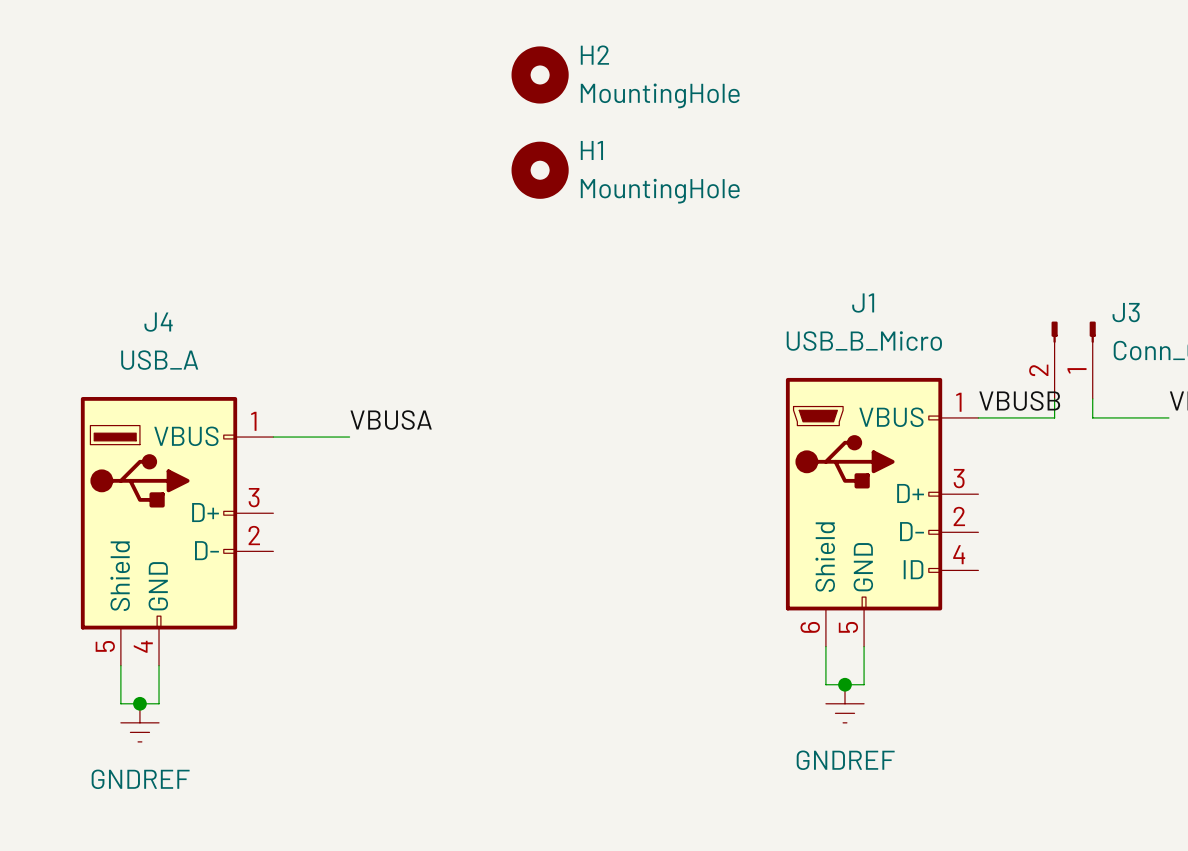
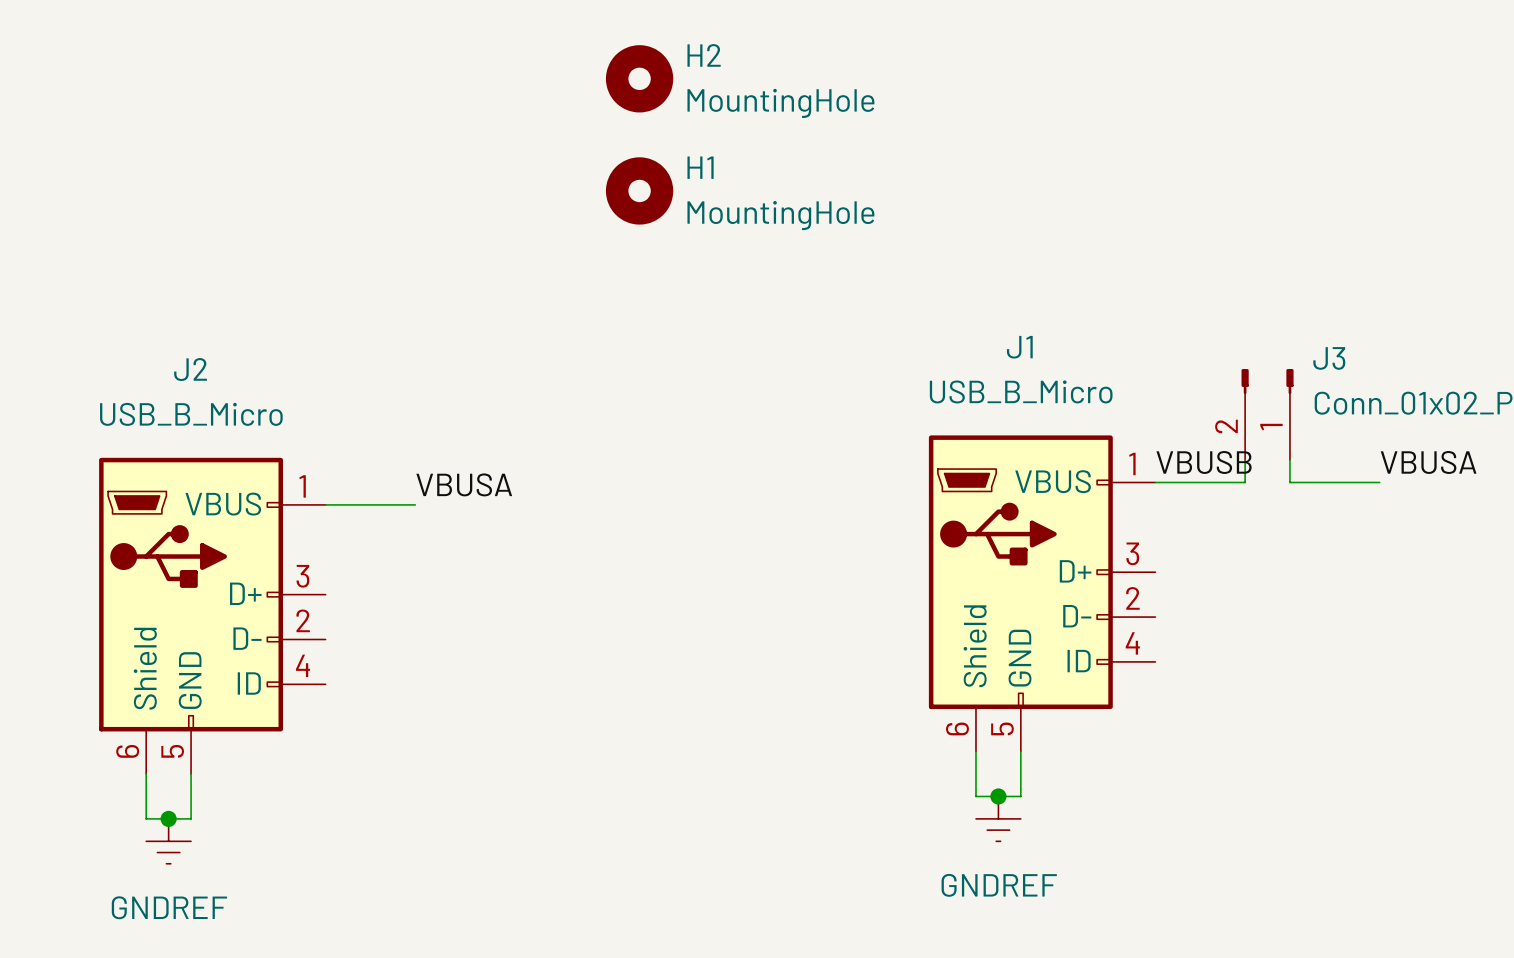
J4: USB_A (177, 531) -> none
J2: none -> USB_B_Micro (212, 615)

